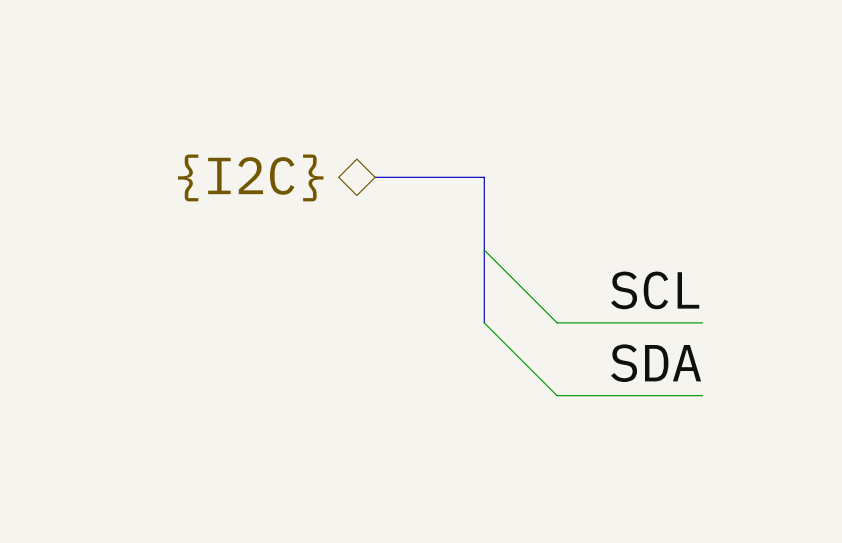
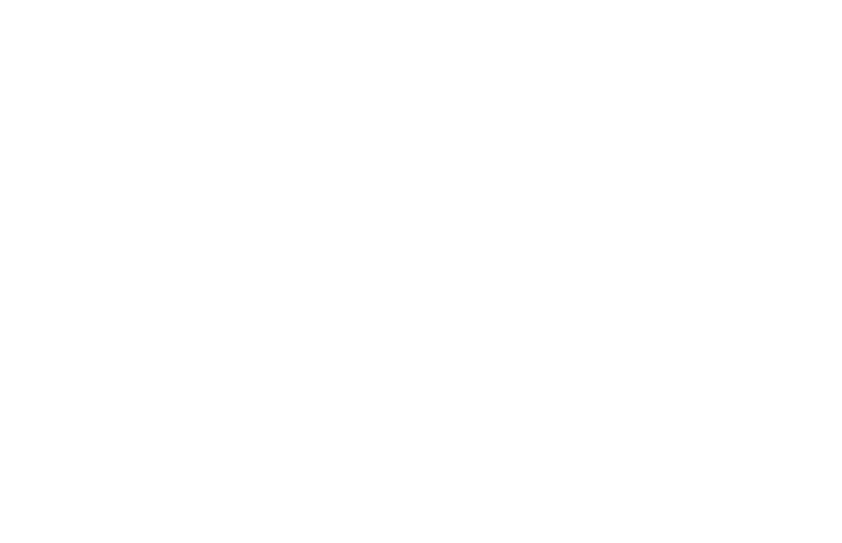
hierarchical label: {I2C} (250, 177) -> none
bus: (375, 177) (484, 177) (484, 322) -> none
wire: (484, 250) (557, 322) (702, 322) -> none
label: SCL (655, 290) -> none
wire: (484, 322) (557, 395) (702, 395) -> none
label: SDA (656, 363) -> none

